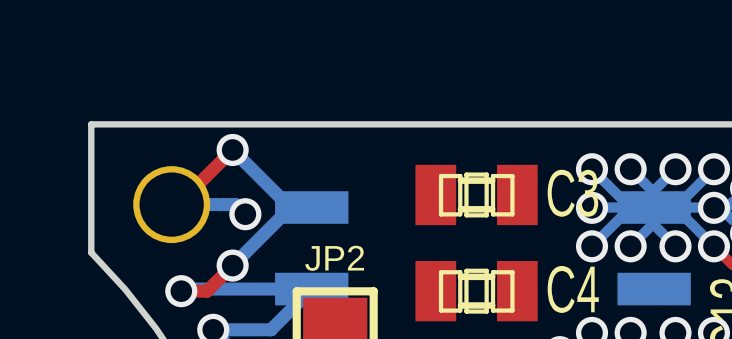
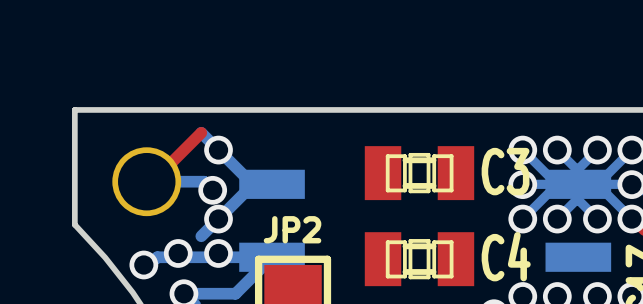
via position: (232, 149) -> (218, 150)
via: none -> (218, 219)
top track: (232, 265) (207, 291) (181, 291) -> none
via: (232, 265) -> none
via: none -> (178, 253)
via: none -> (218, 253)
via: (181, 291) -> none
via: none -> (143, 264)

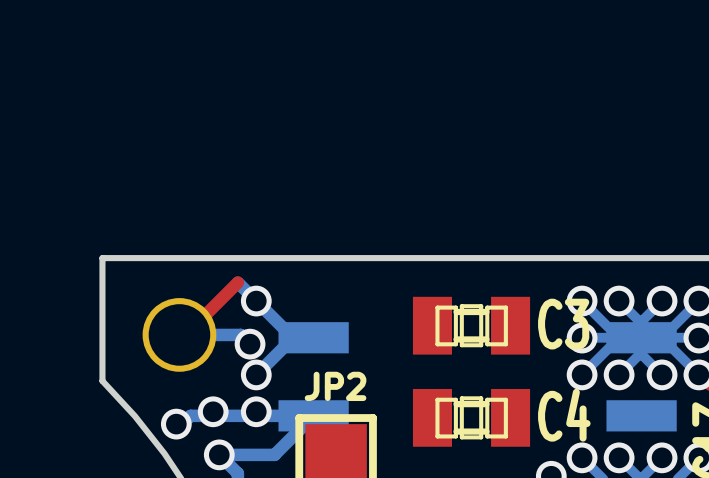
bottom track: (218, 219) (201, 236) -> none

